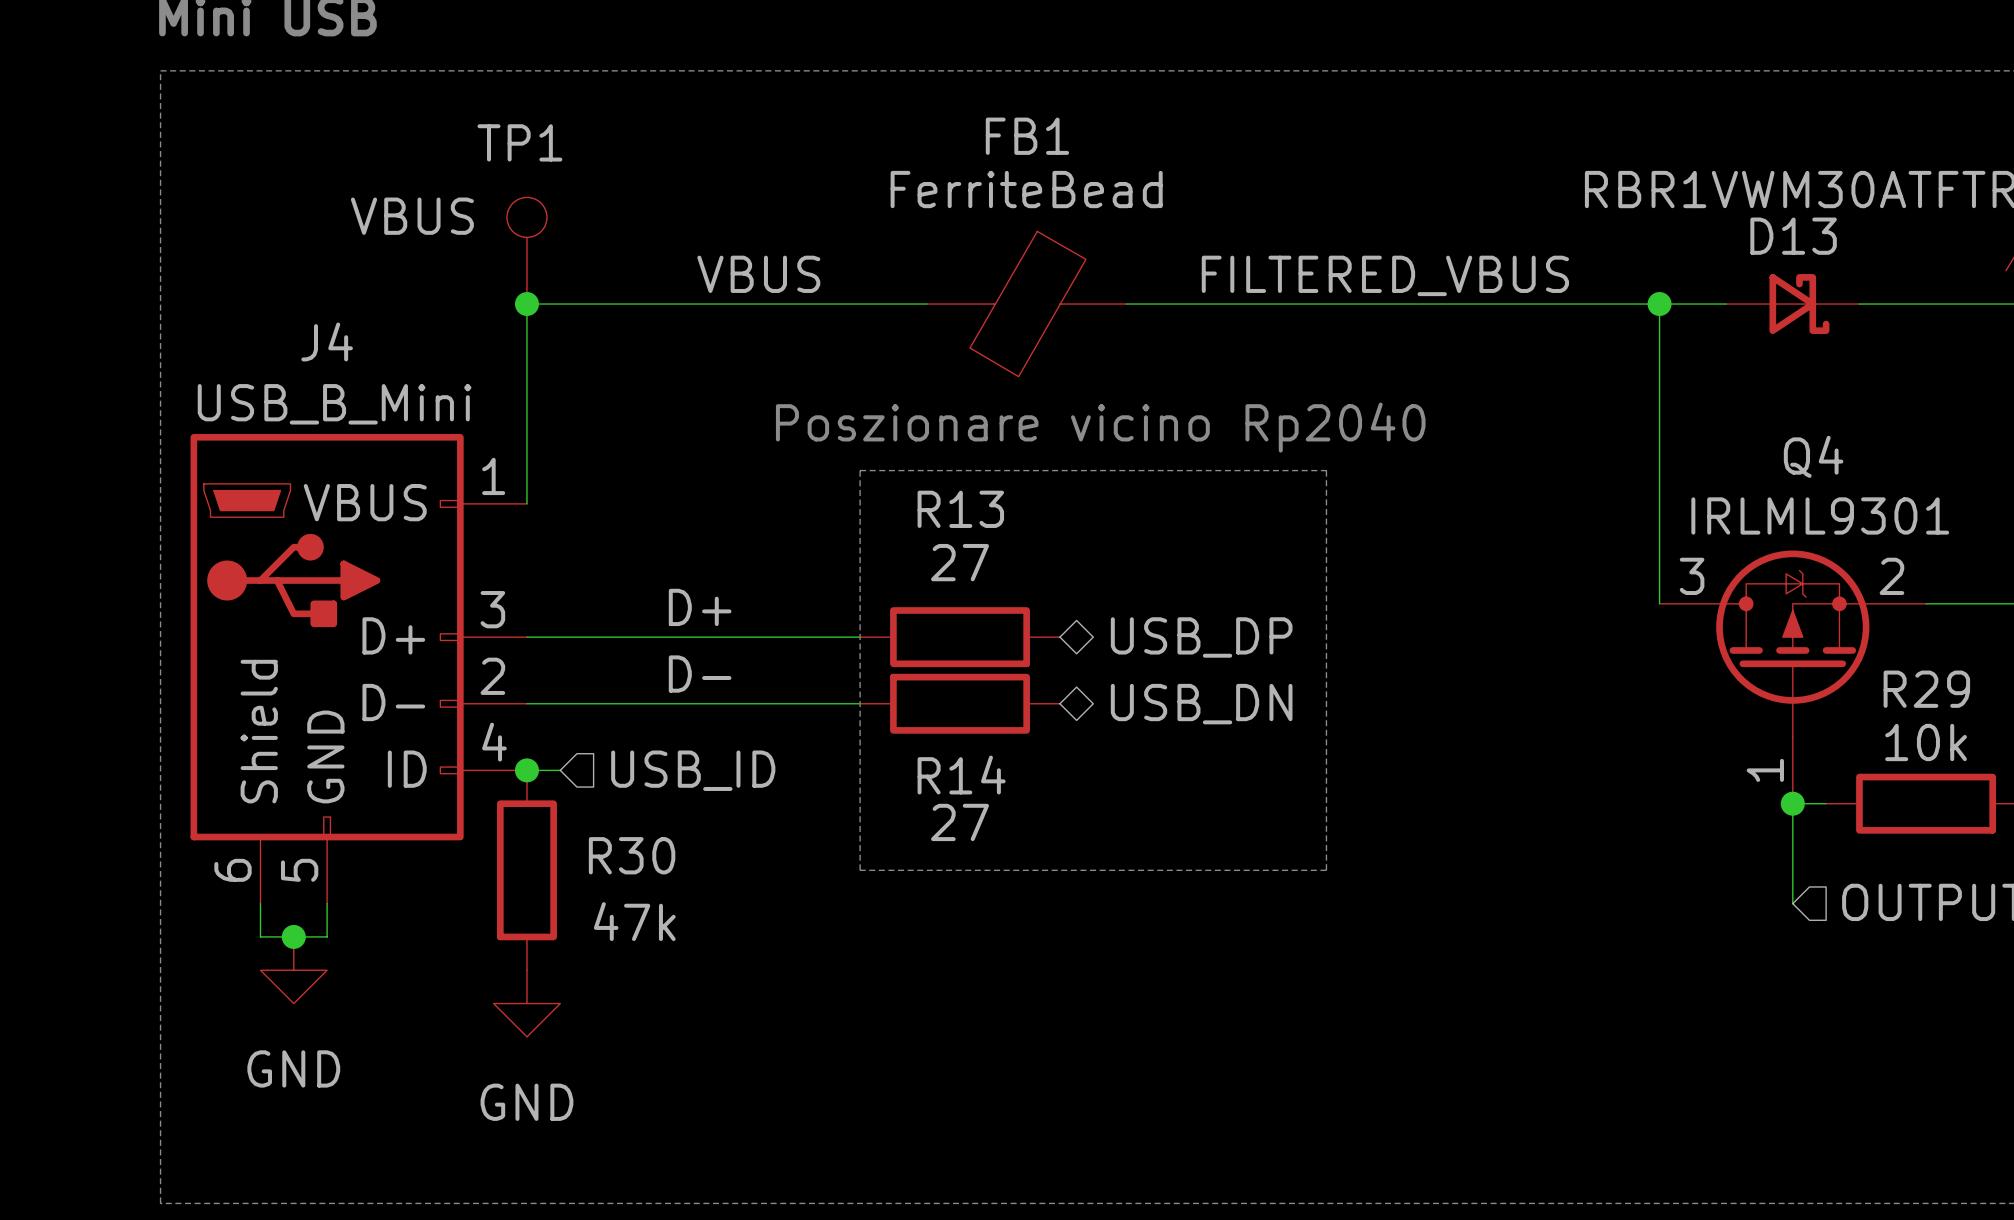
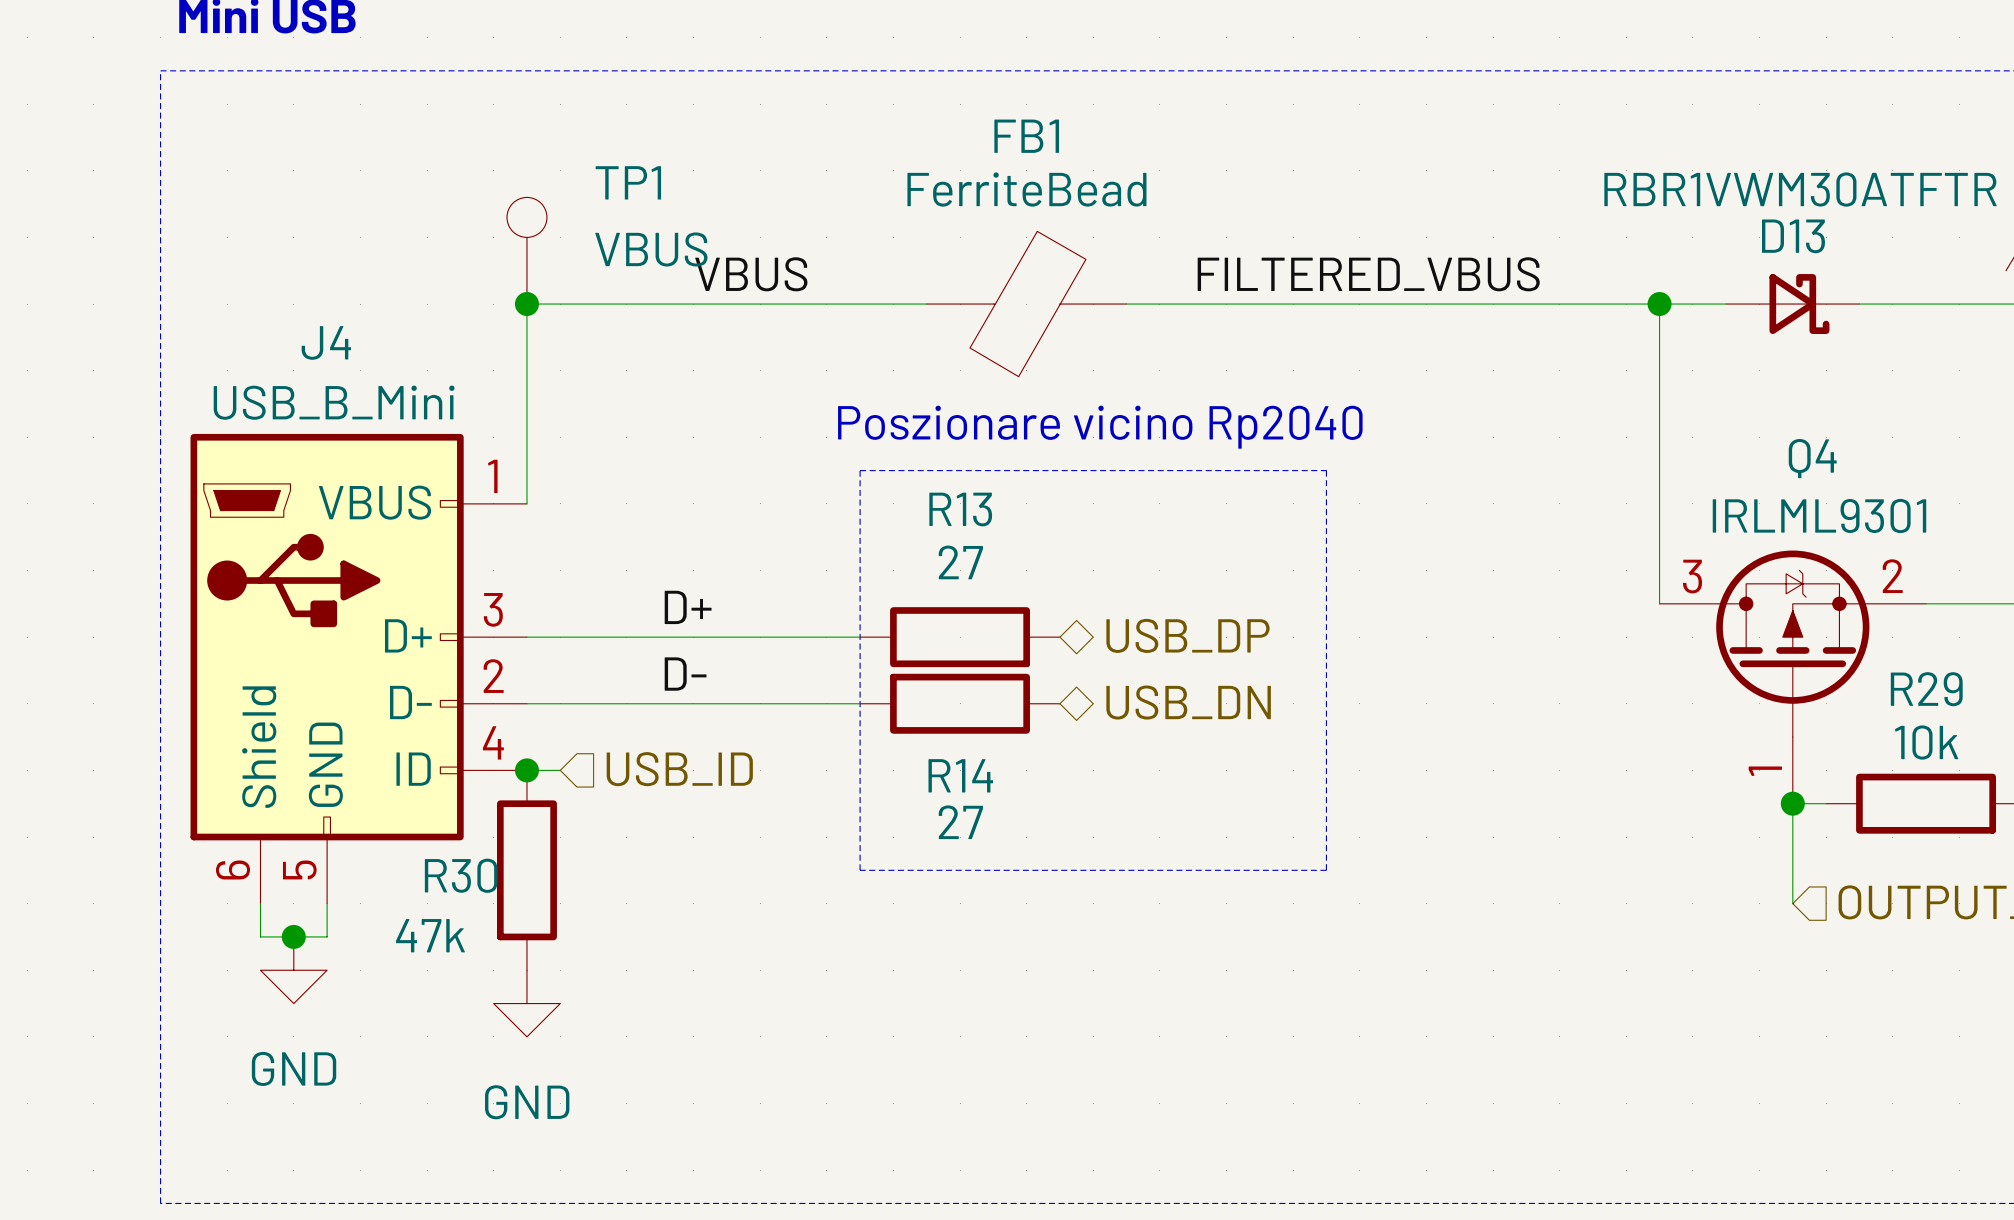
TP1 name position: TP1 (519, 142) -> TP1 (628, 182)
TP1 value position: VBUS (412, 216) -> VBUS (651, 249)
R30 name position: R30 (632, 855) -> R30 (461, 875)
R30 value position: 47k (634, 921) -> 47k (430, 935)

